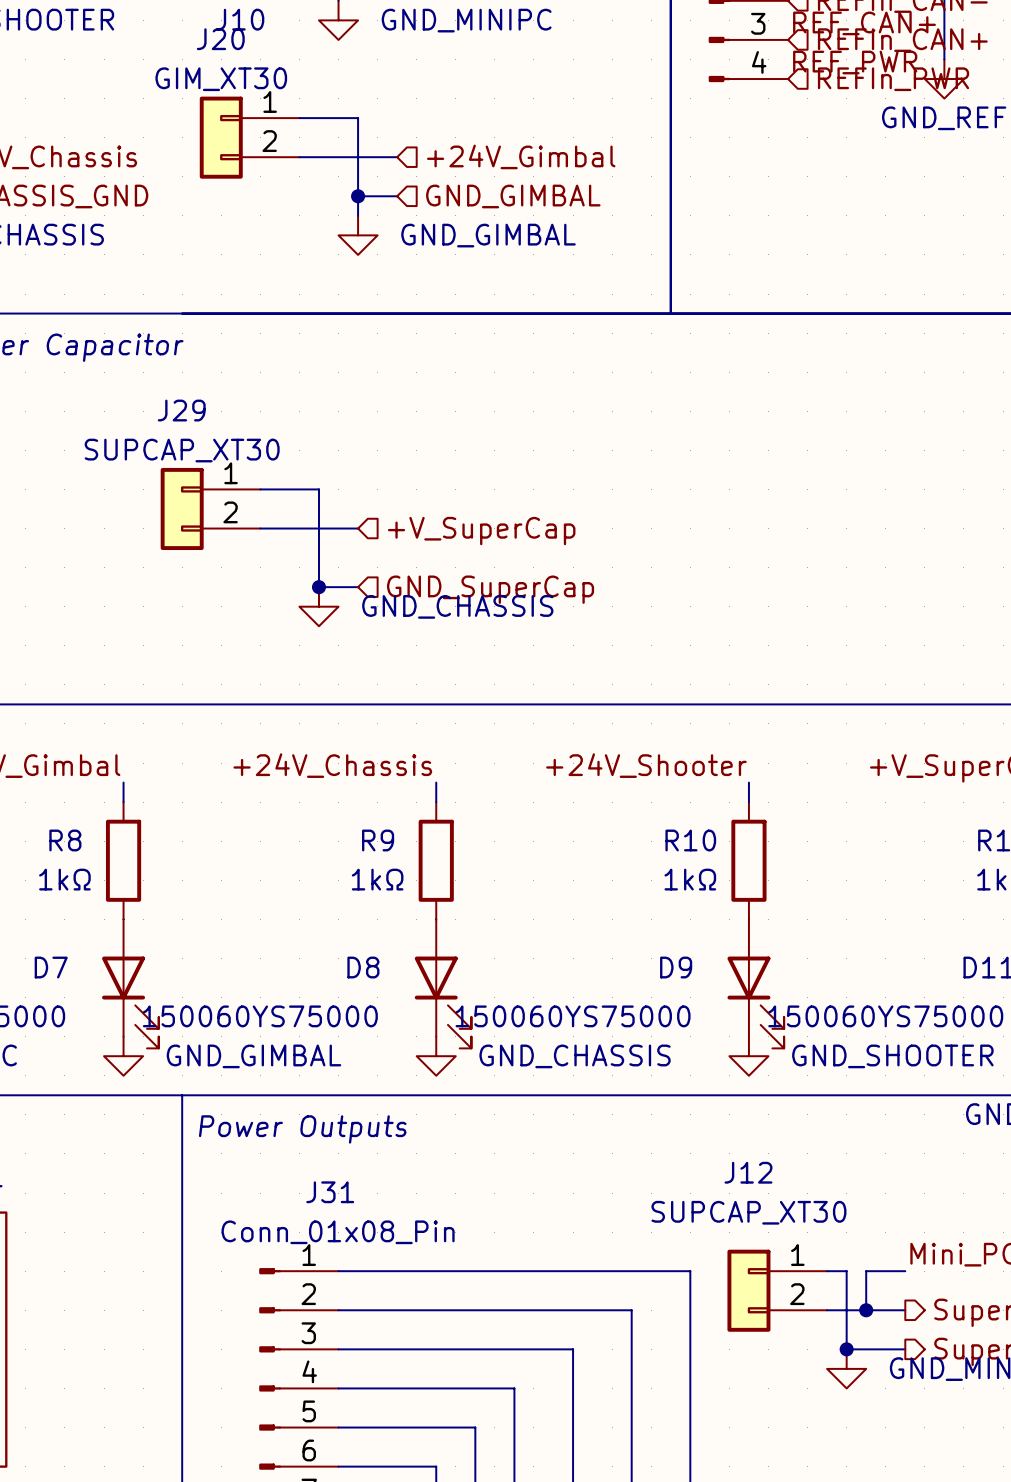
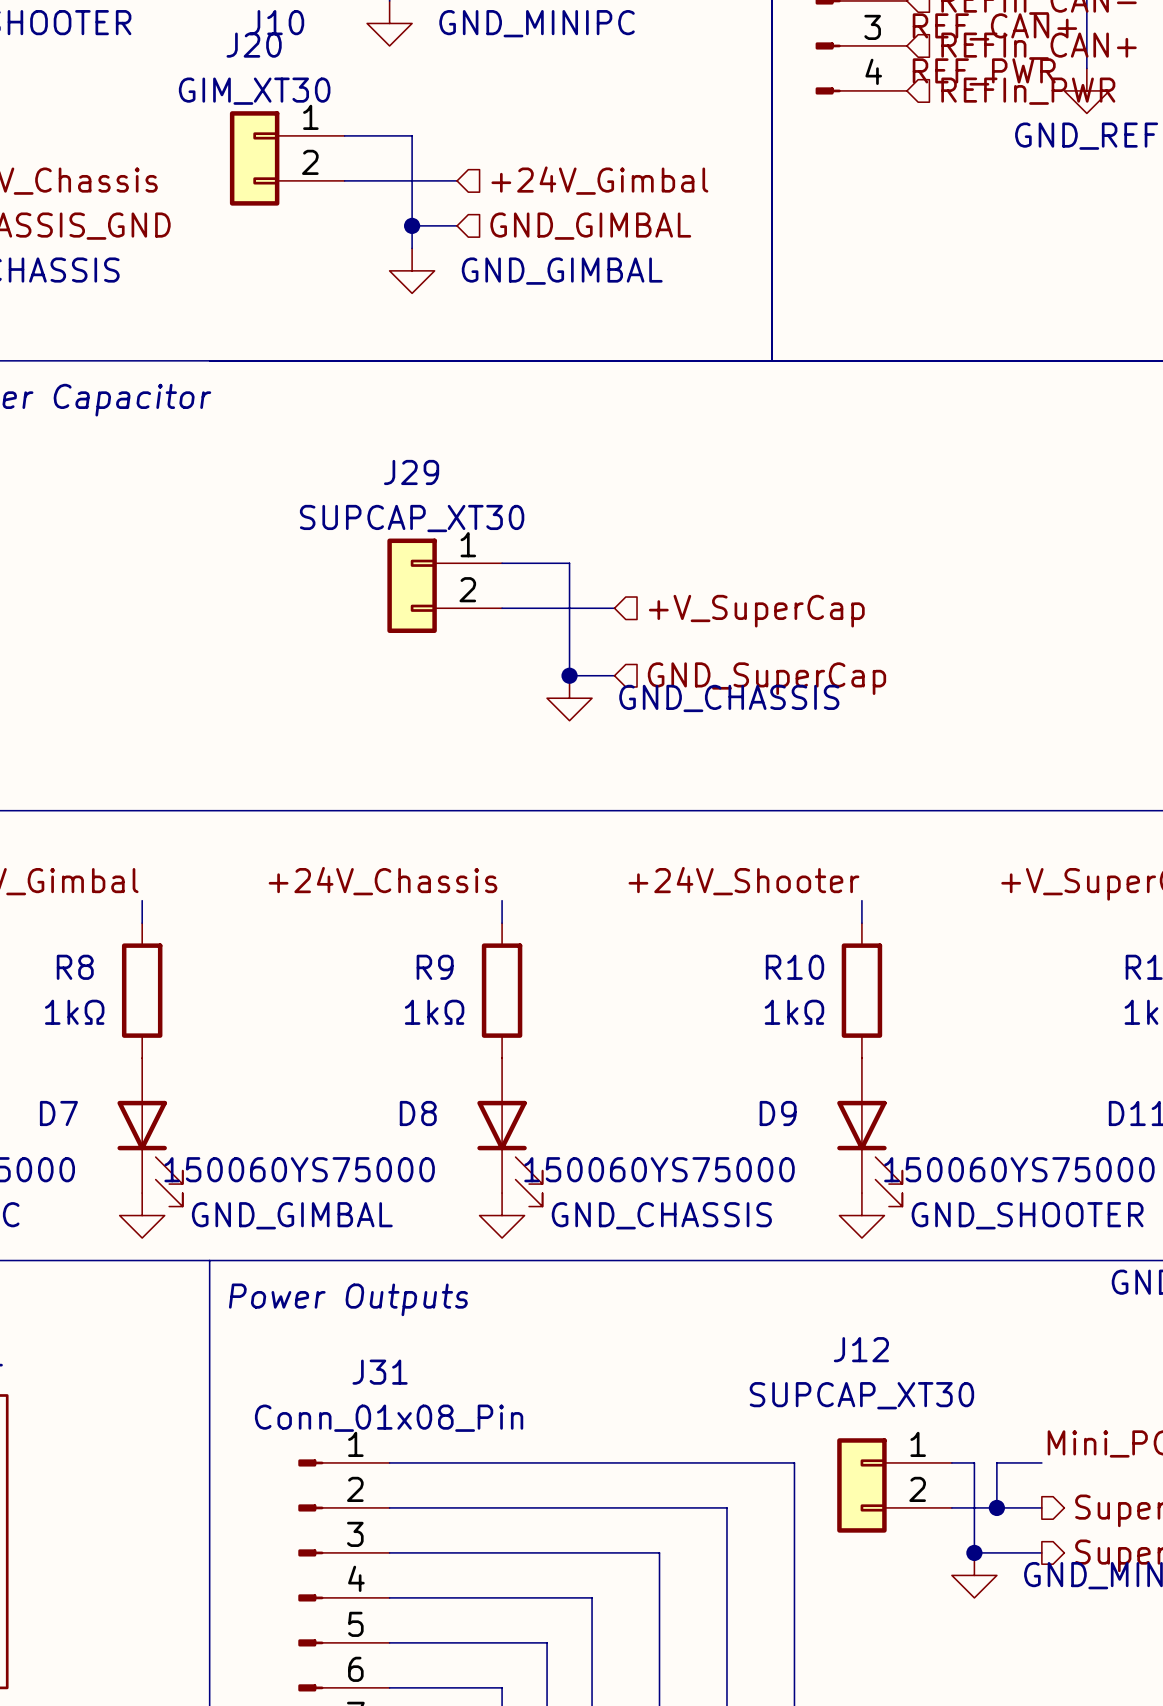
wire: (260, 489) (318, 489) (318, 587) (358, 587) -> (502, 563) (569, 563) (569, 675) (614, 675)
J29 position: (210, 508) -> (444, 585)
wire: (260, 528) (358, 528) -> (502, 608) (614, 608)
hierarchical label position: +V_SuperCap (481, 531) -> +V_SuperCap (756, 611)
junction: (318, 587) -> none
junction: none -> (569, 675)
hierarchical label position: GND_SuperCap (490, 589) -> GND_SuperCap (766, 678)
power symbol position: GND_CHASSIS (318, 606) -> GND_CHASSIS (569, 698)

